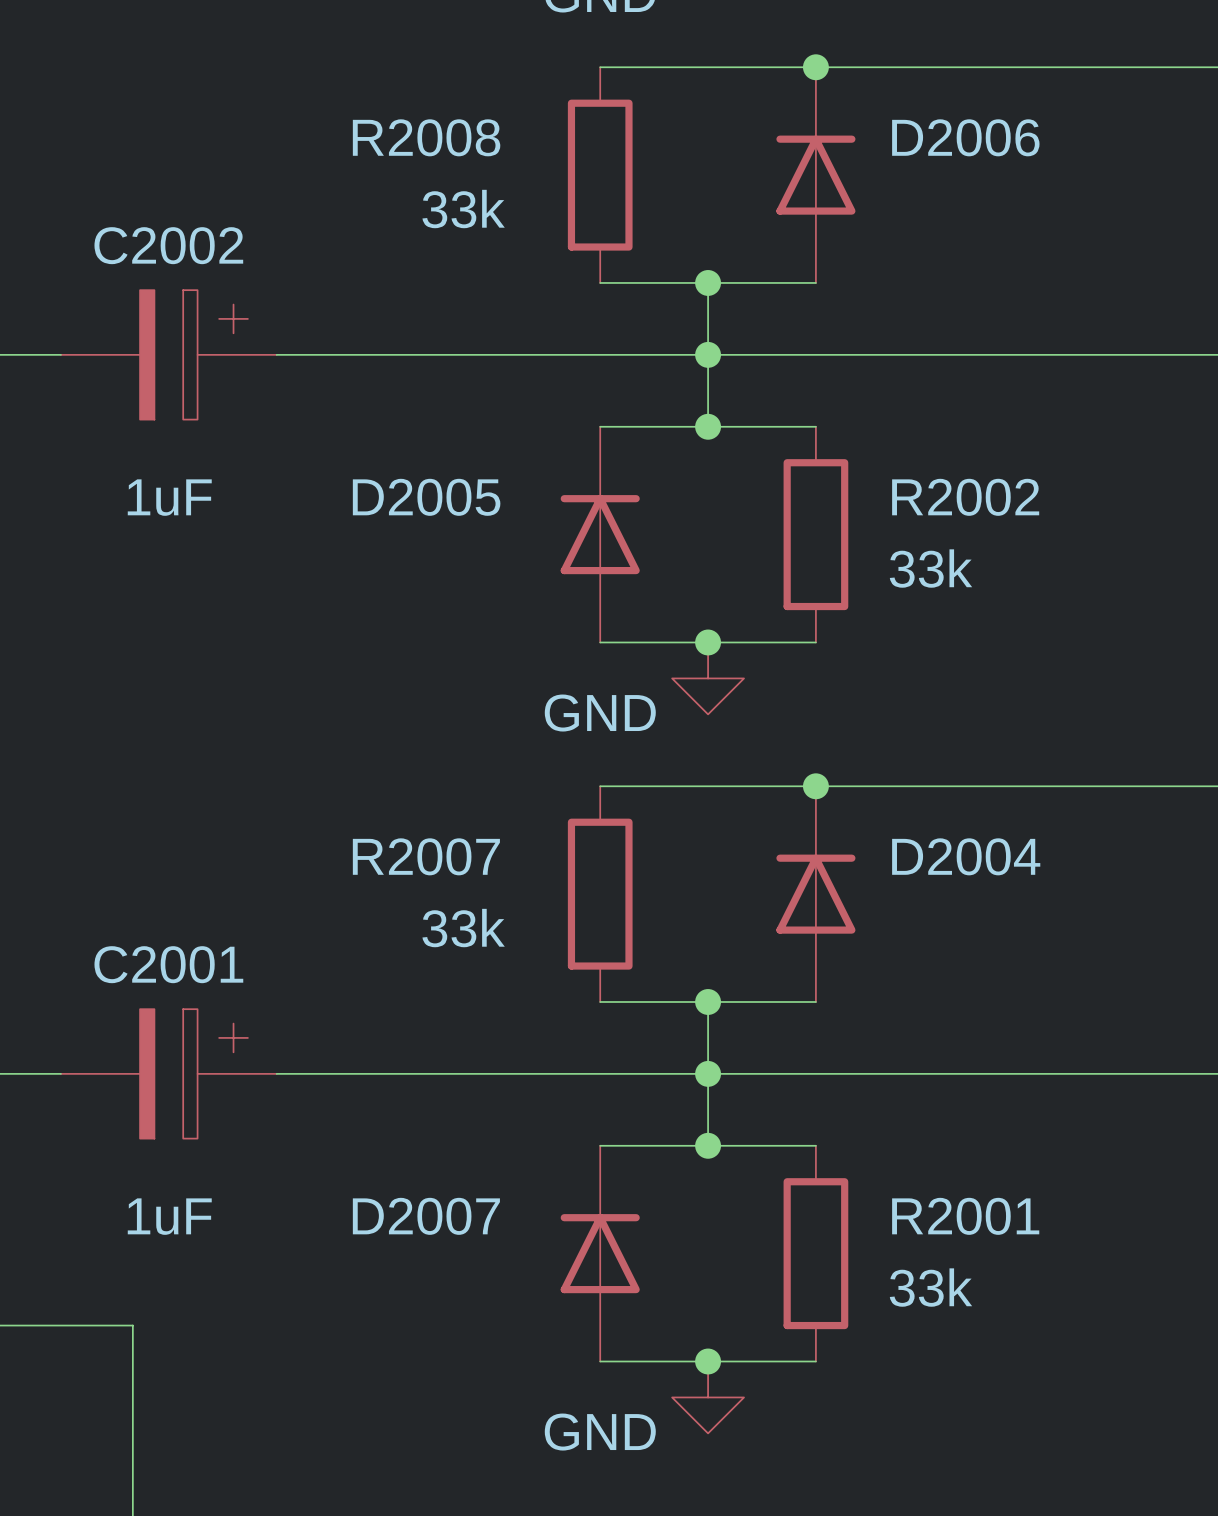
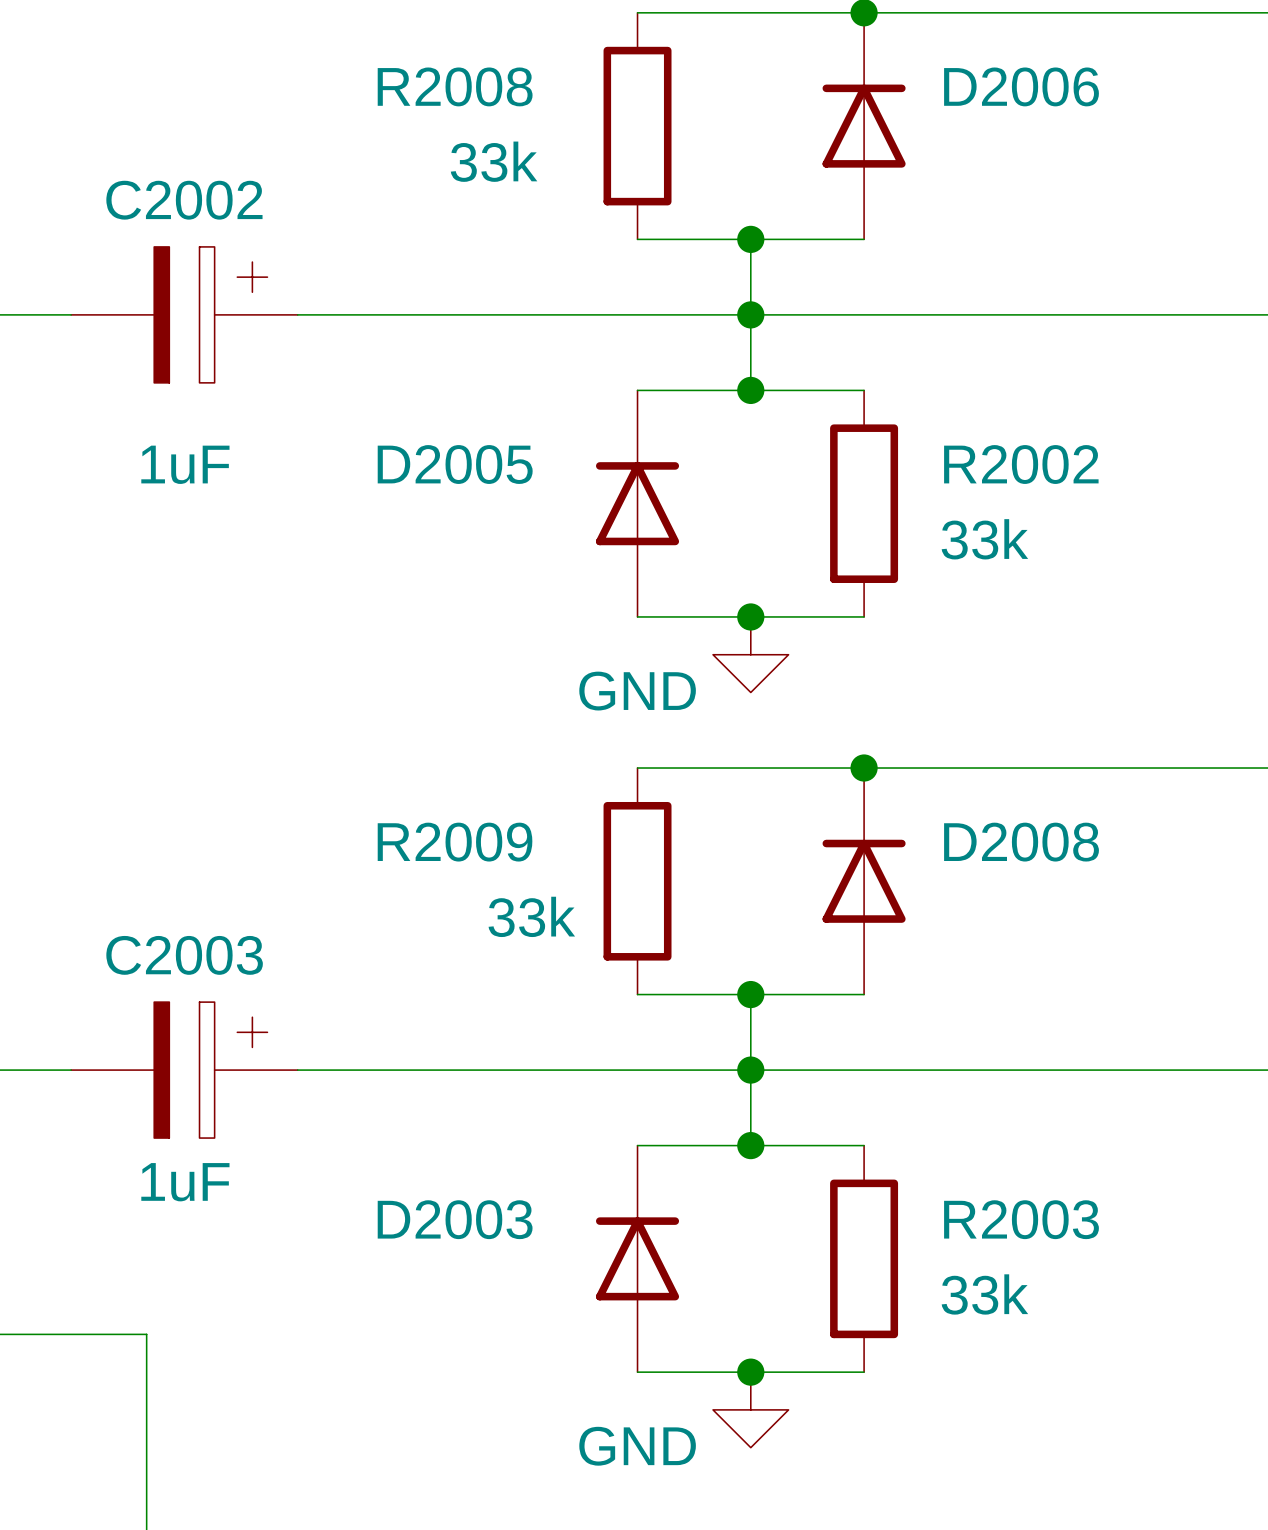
R2007 name: R2007 (426, 856) -> R2009 (455, 842)
D2004 name: D2004 (966, 856) -> D2008 (1021, 842)
R2007 value position: 33k (463, 928) -> 33k (531, 916)
C2001 name: C2001 (168, 964) -> C2003 (184, 955)
C2001 value position: 1uF (169, 1216) -> 1uF (185, 1182)
D2007 name: D2007 (426, 1216) -> D2003 (455, 1219)
R2001 name: R2001 (965, 1216) -> R2003 (1021, 1219)

